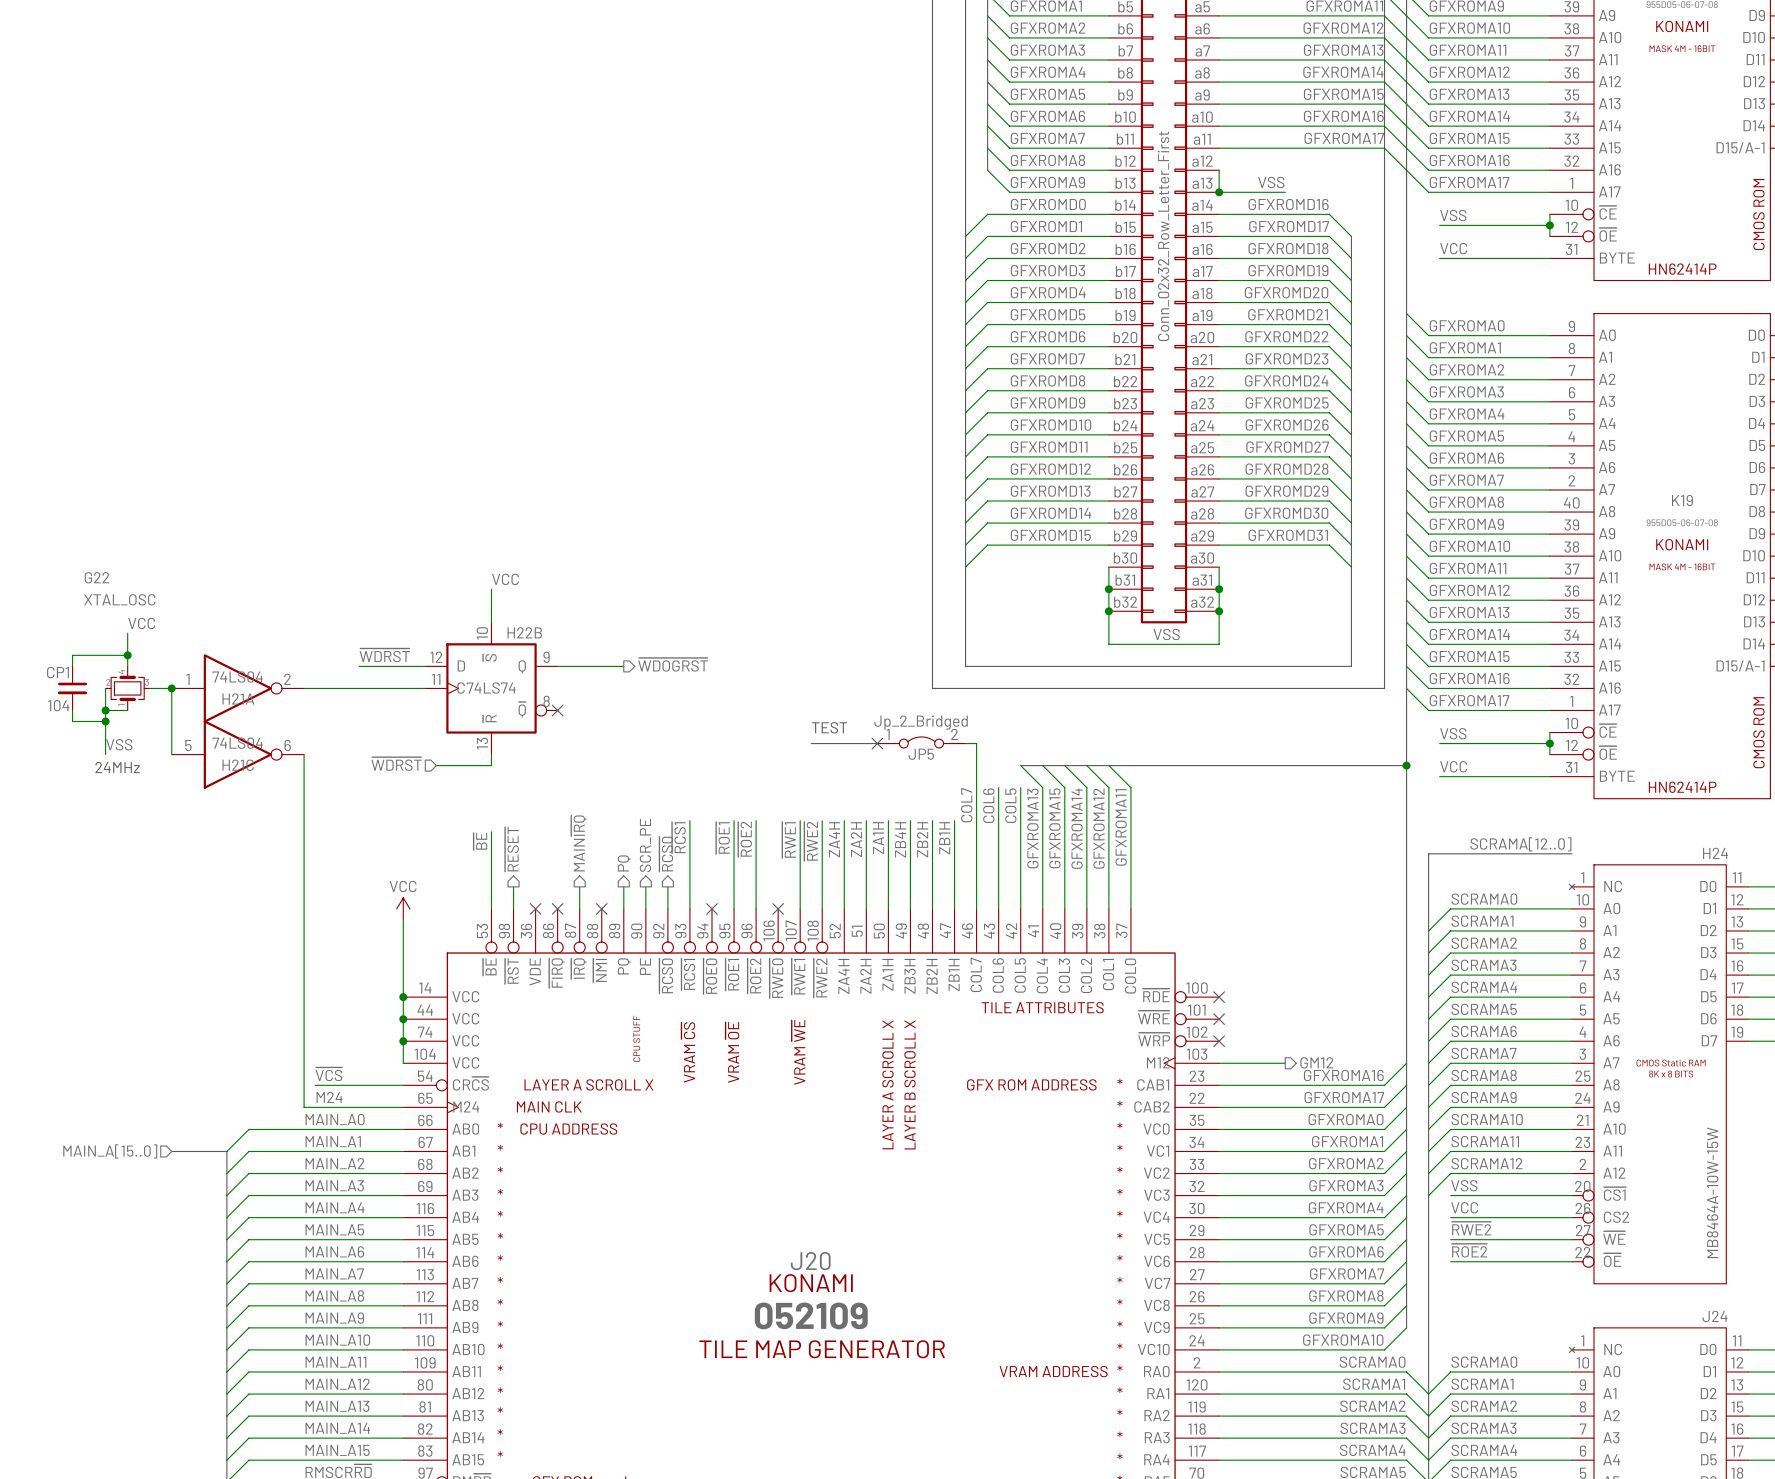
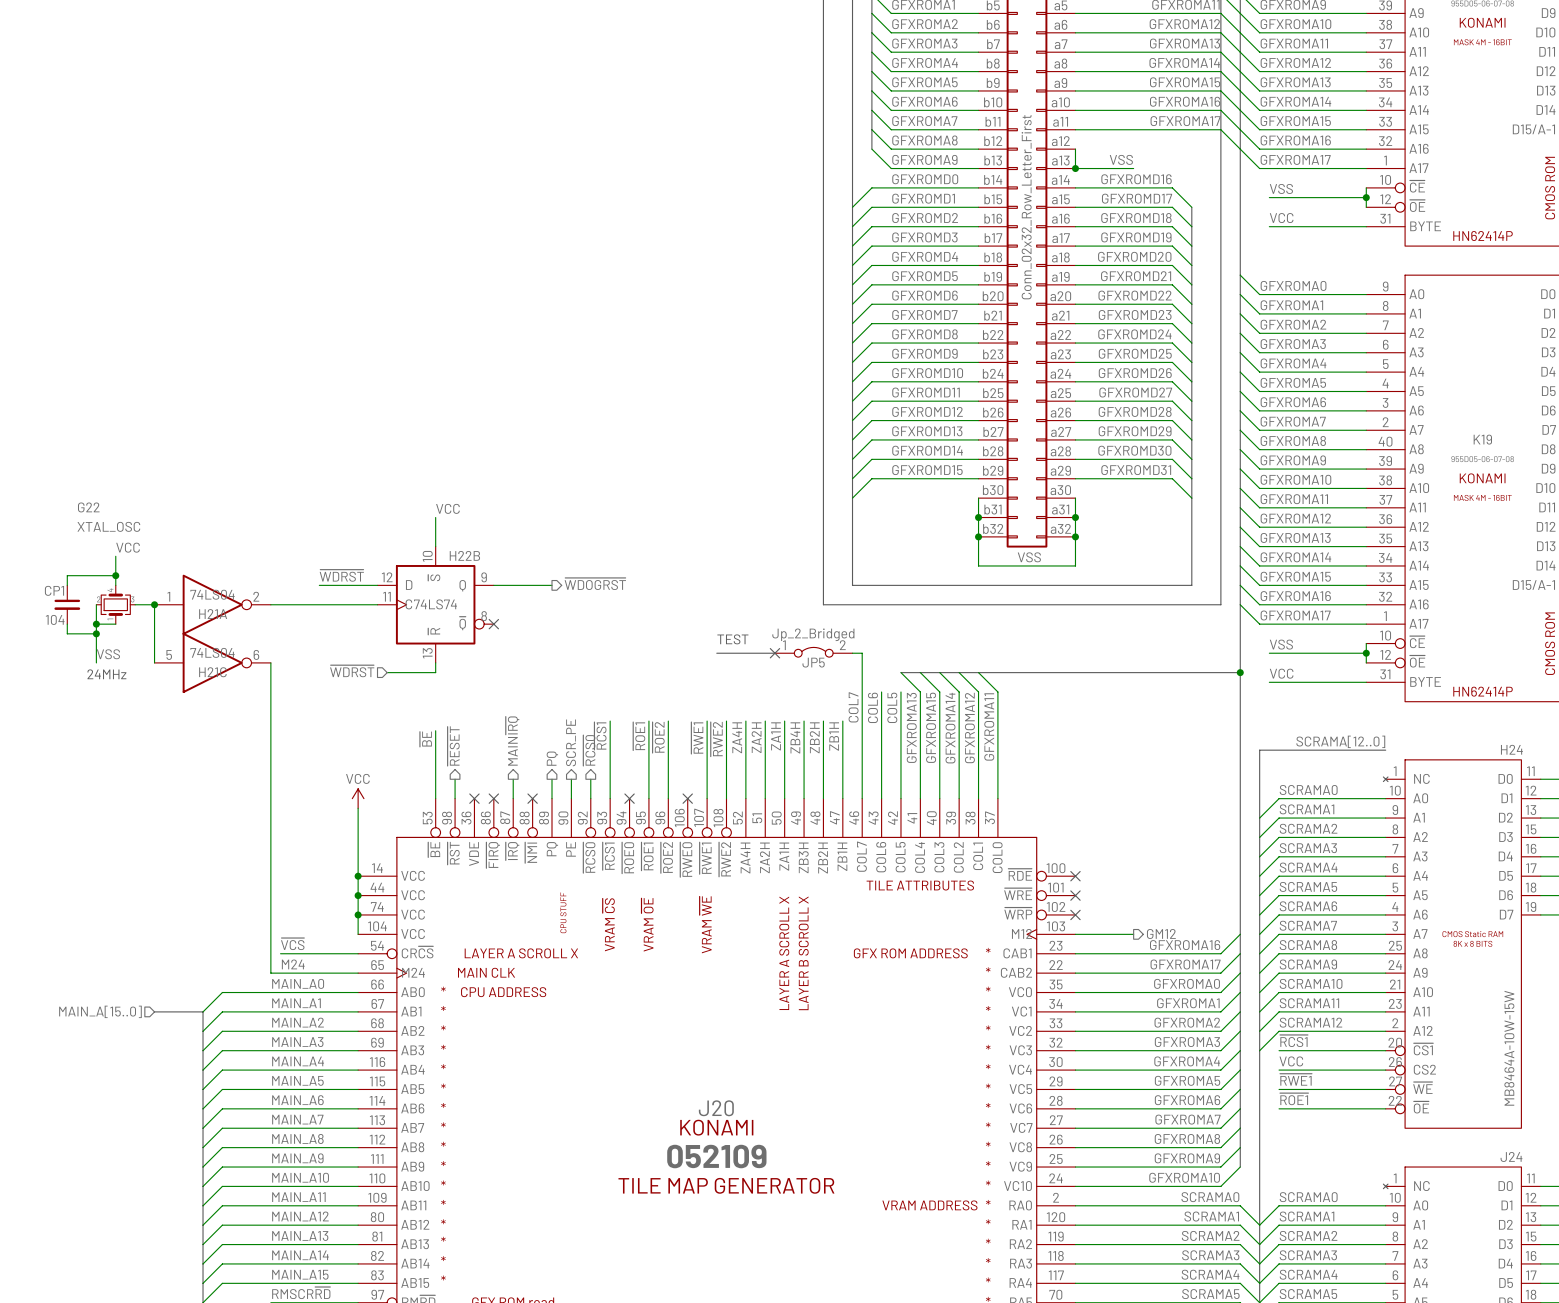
label: VSS (1464, 1185) -> ~{RCS1} (1293, 1040)
label: ~{RWE2} (1471, 1228) -> ~{RWE1} (1295, 1079)
label: ~{ROE2} (1469, 1250) -> ~{ROE1} (1294, 1099)

